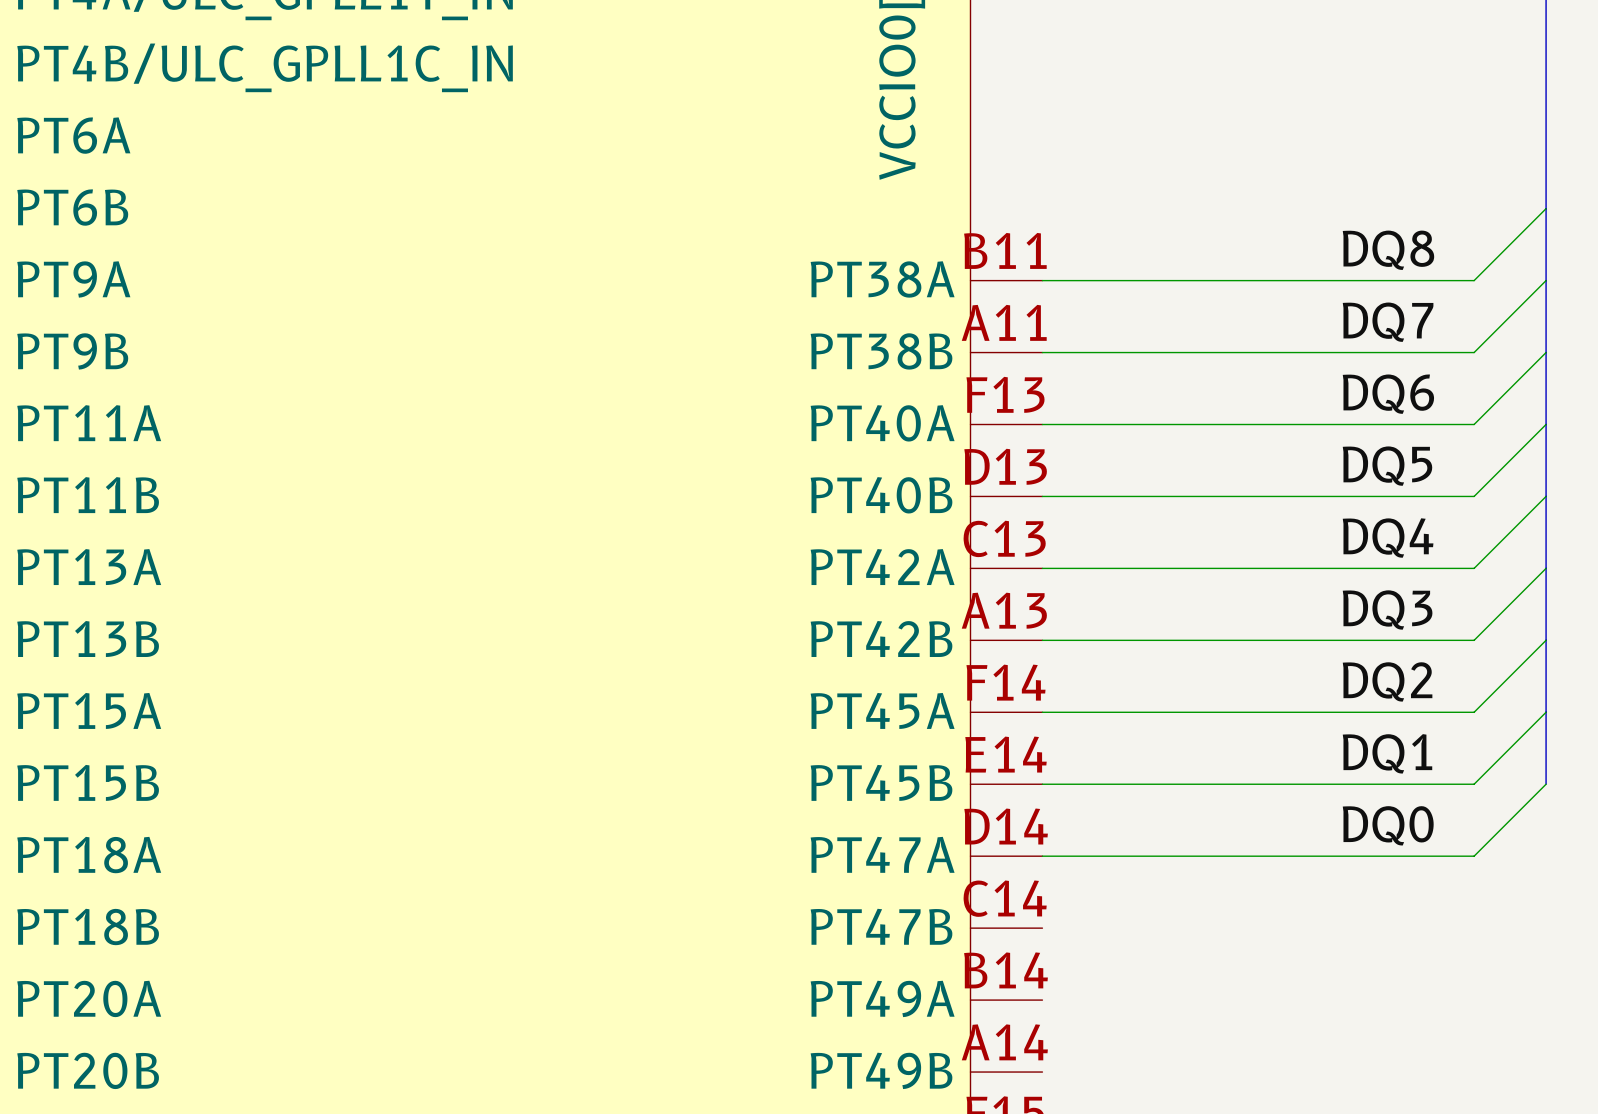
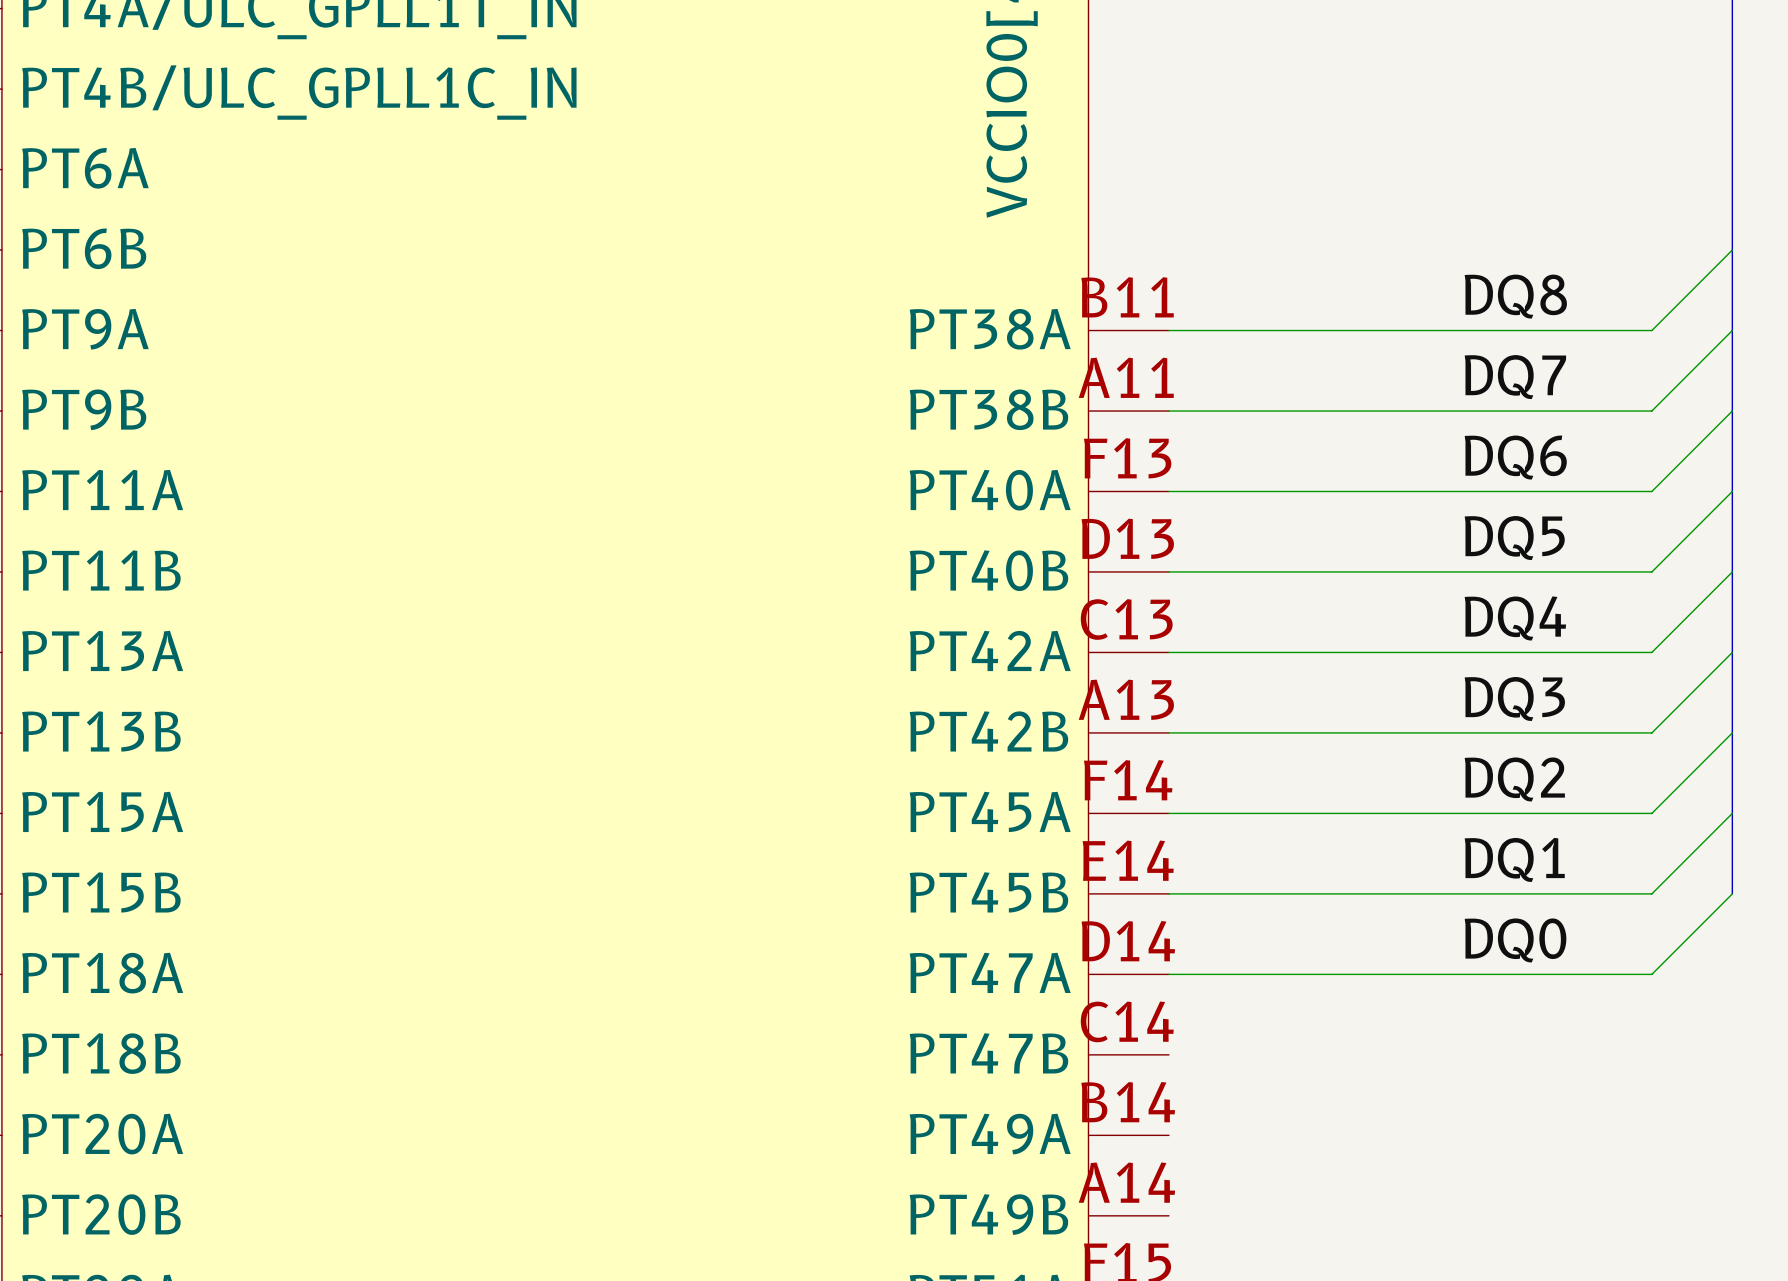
label position: DQ8 (1388, 250) -> DQ8 (1515, 296)
label position: DQ7 (1388, 322) -> DQ7 (1515, 377)
label position: DQ6 (1388, 394) -> DQ6 (1515, 457)
label position: DQ5 (1387, 466) -> DQ5 (1514, 538)
label position: DQ4 (1388, 538) -> DQ4 (1515, 618)
label position: DQ3 (1387, 609) -> DQ3 (1514, 698)
label position: DQ2 (1387, 681) -> DQ2 (1514, 779)
label position: DQ1 (1387, 753) -> DQ1 (1514, 859)
label position: DQ0 (1388, 825) -> DQ0 (1515, 940)

